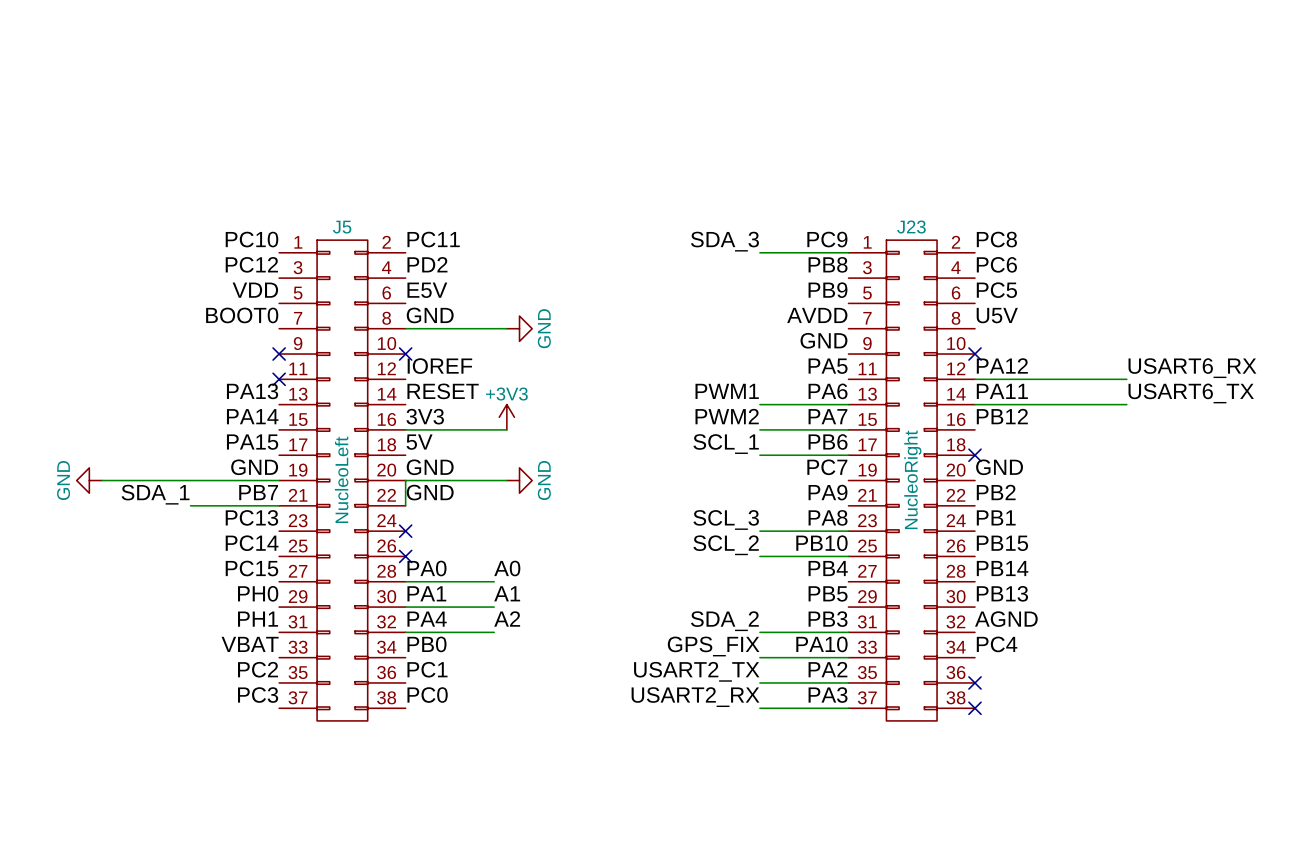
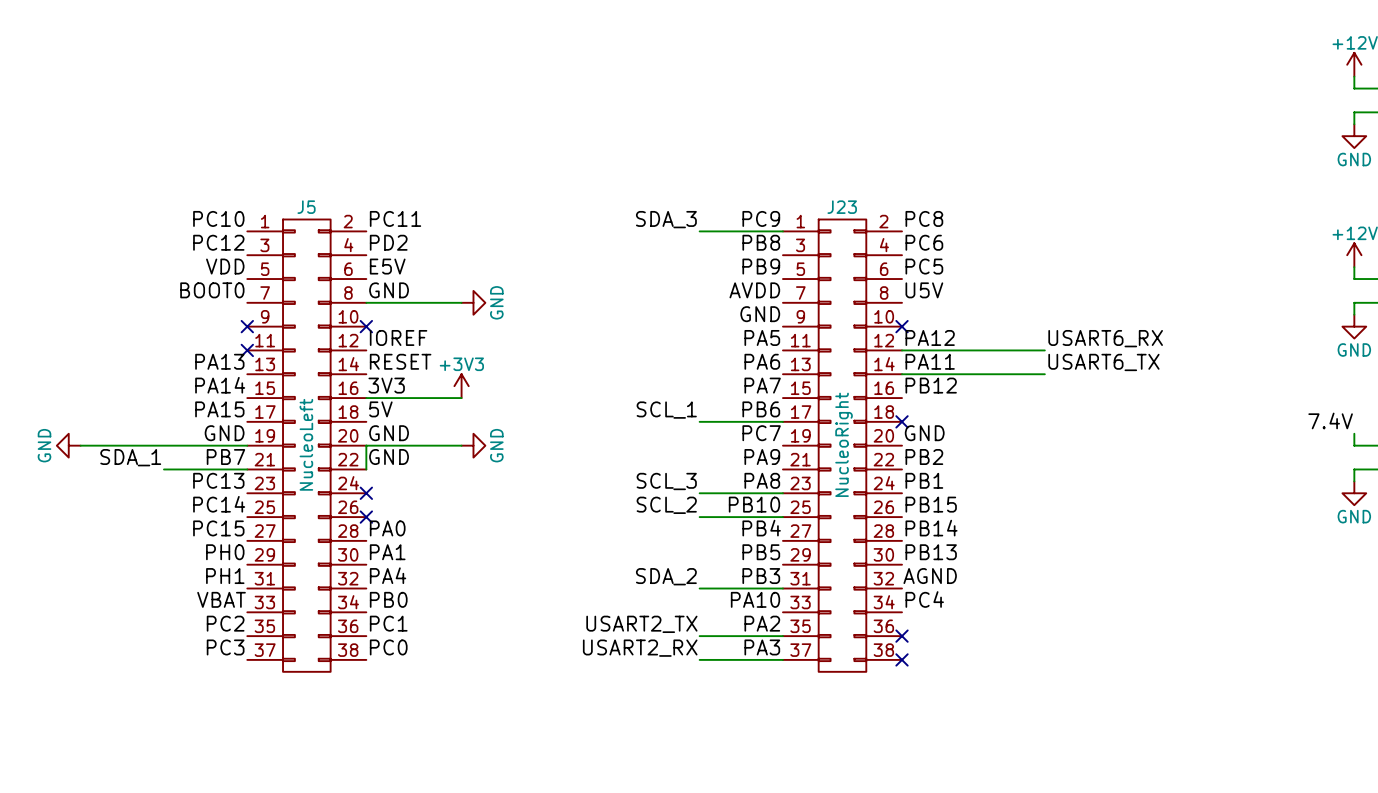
label: PWM1 (727, 391) -> none
wire: (759, 404) (848, 404) -> none
label: PWM2 (727, 416) -> none
wire: (759, 429) (848, 429) -> none
label: A0 (507, 568) -> none
wire: (405, 581) (494, 581) -> none
label: A1 (507, 593) -> none
wire: (405, 607) (494, 607) -> none
label: A2 (507, 619) -> none
wire: (405, 632) (494, 632) -> none
label: GPS_FIX (713, 646) -> none
wire: (759, 657) (848, 657) -> none

